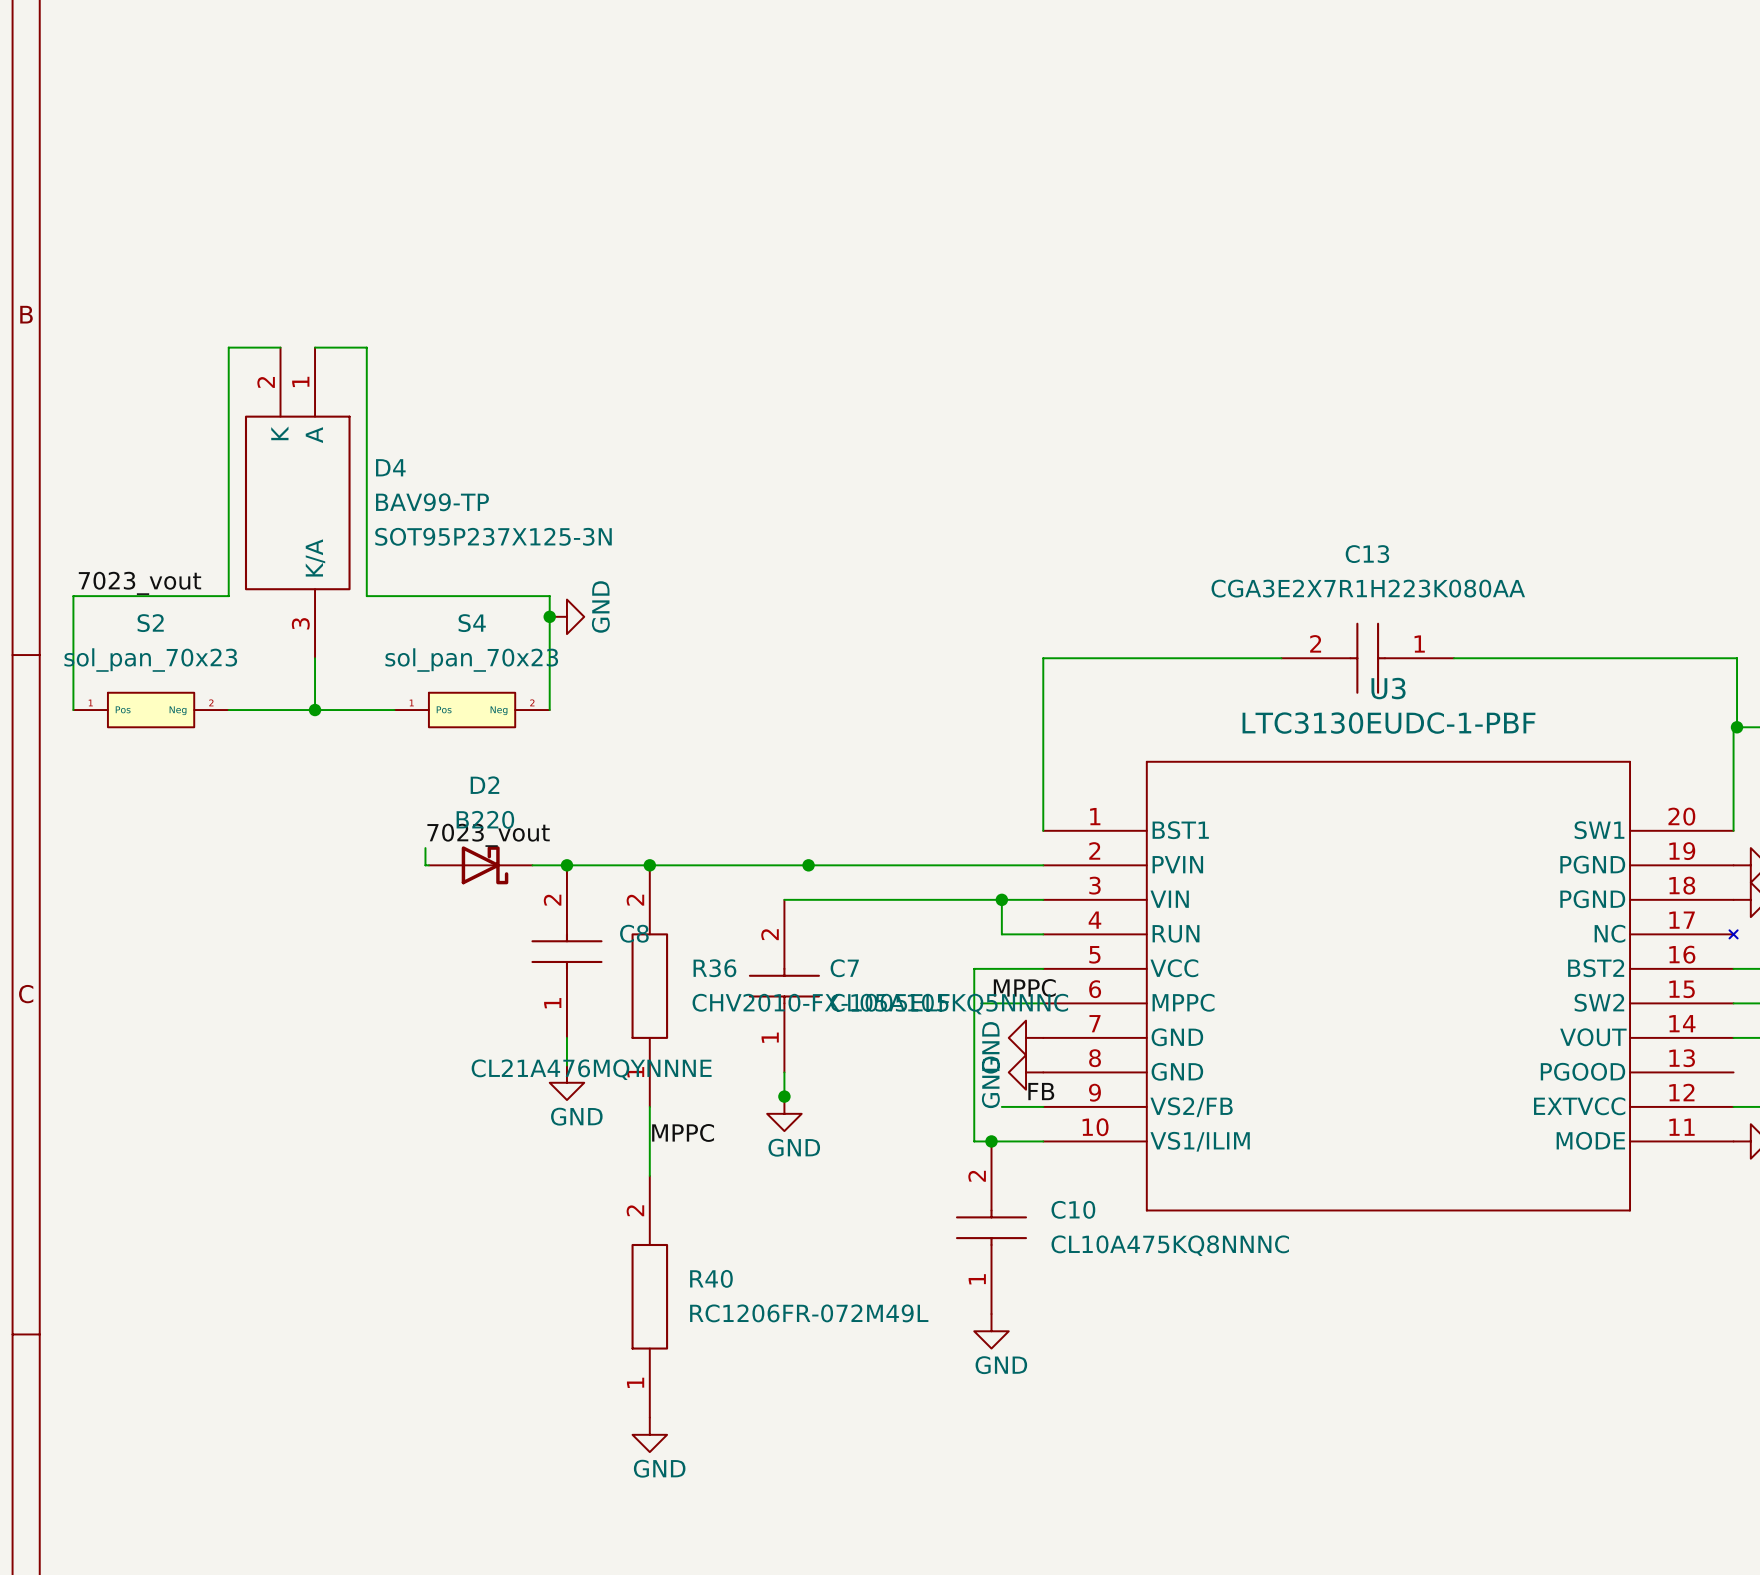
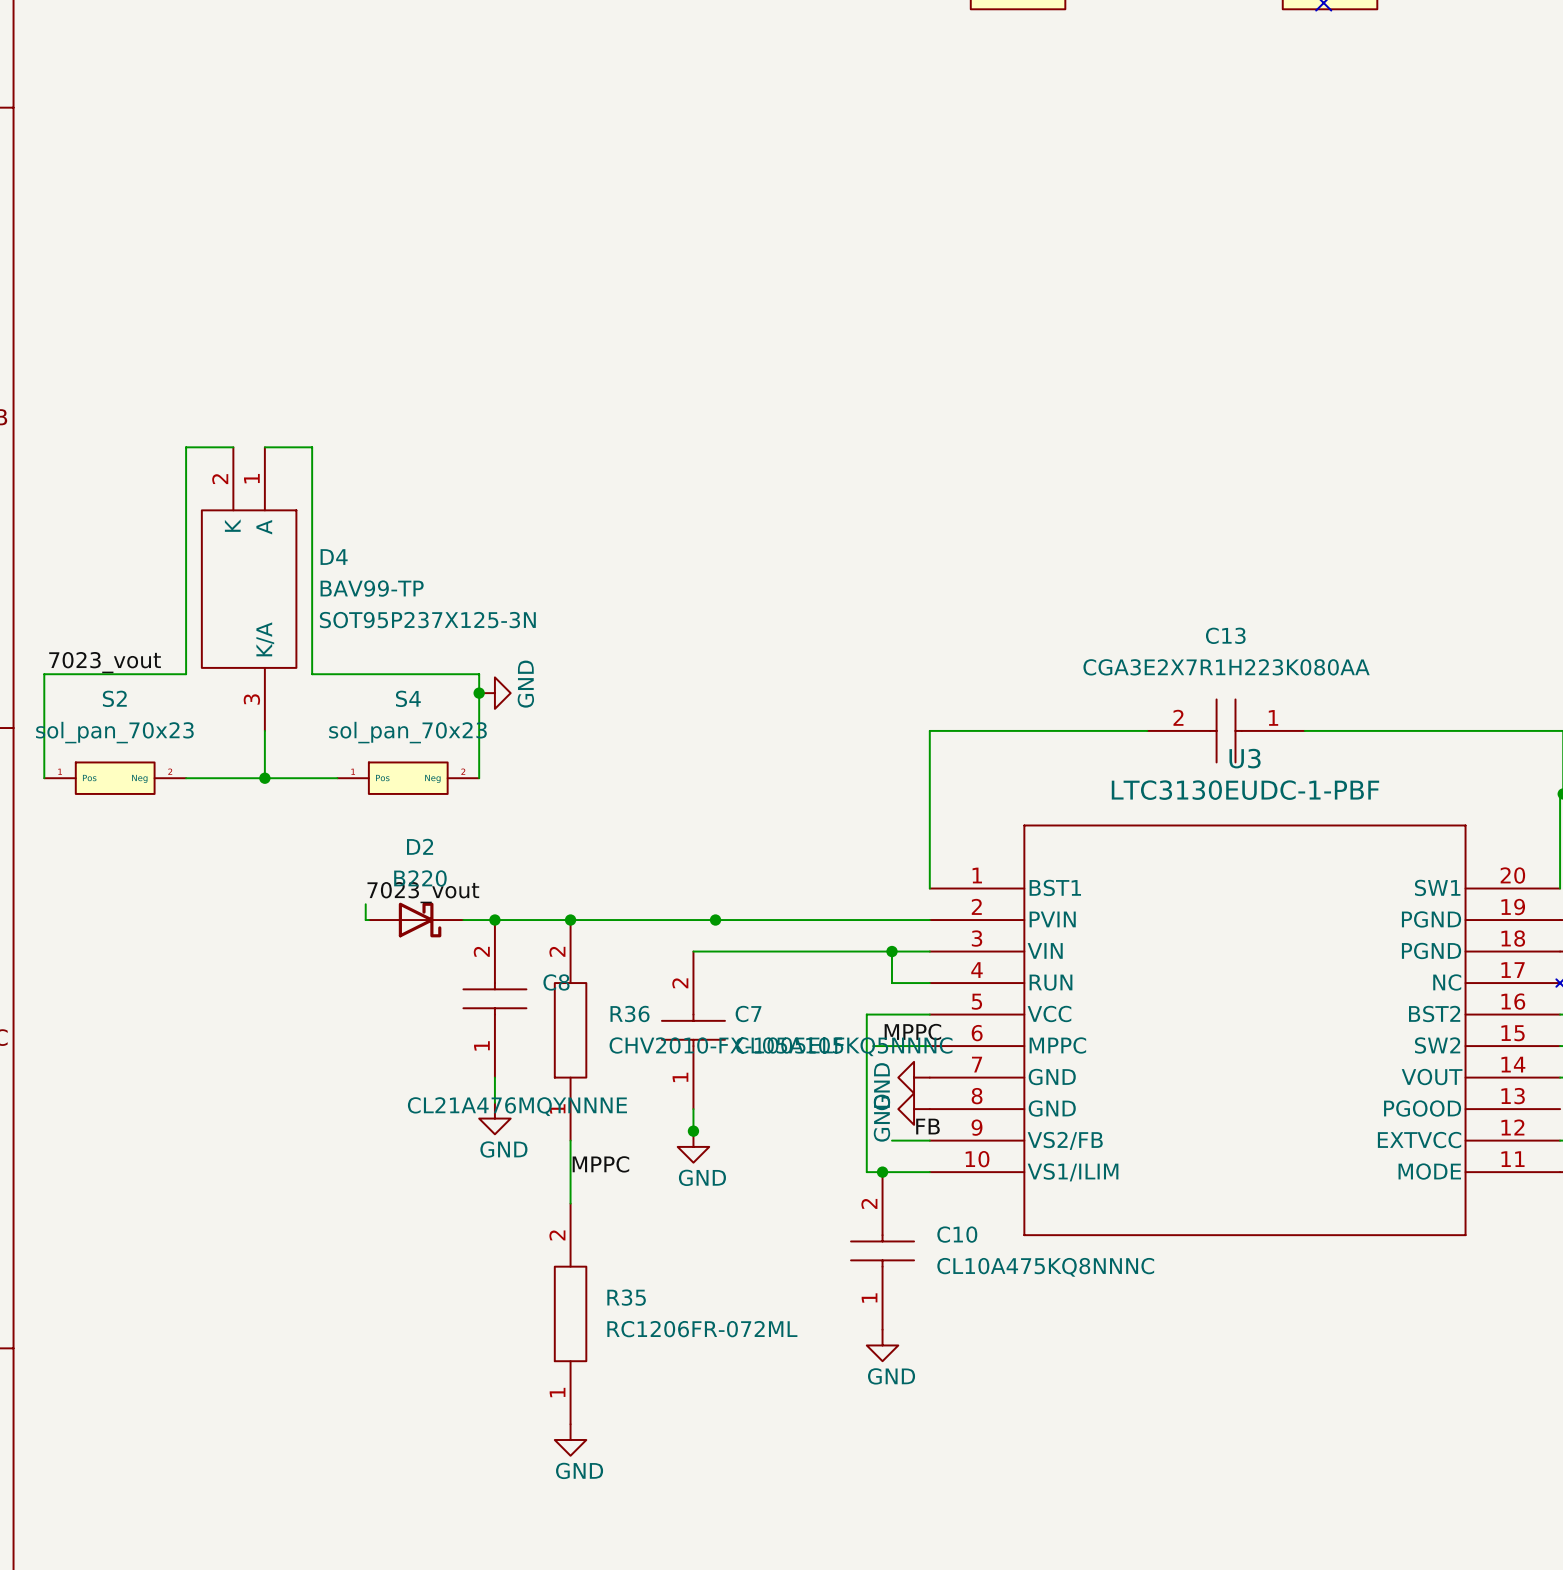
R40 name: R40 (711, 1278) -> R35 (626, 1297)
R40 value: RC1206FR-072M49L (809, 1313) -> RC1206FR-072ML (702, 1329)

